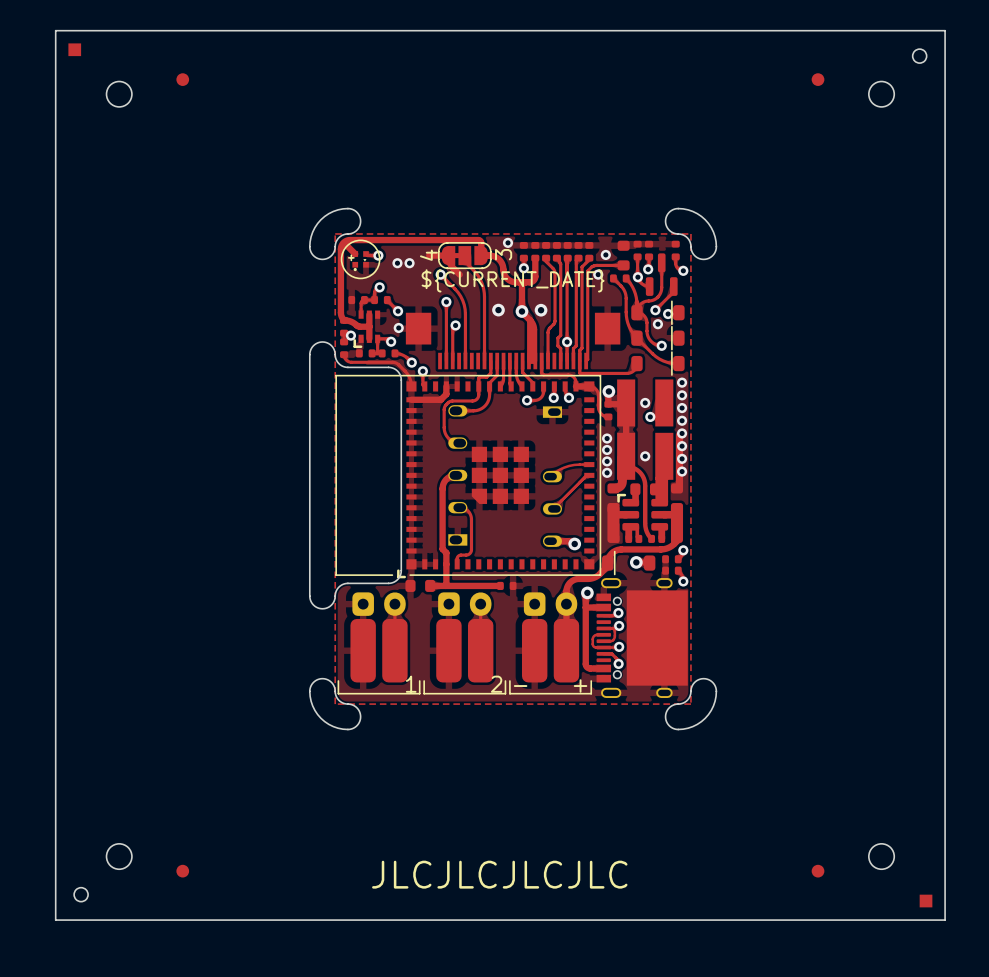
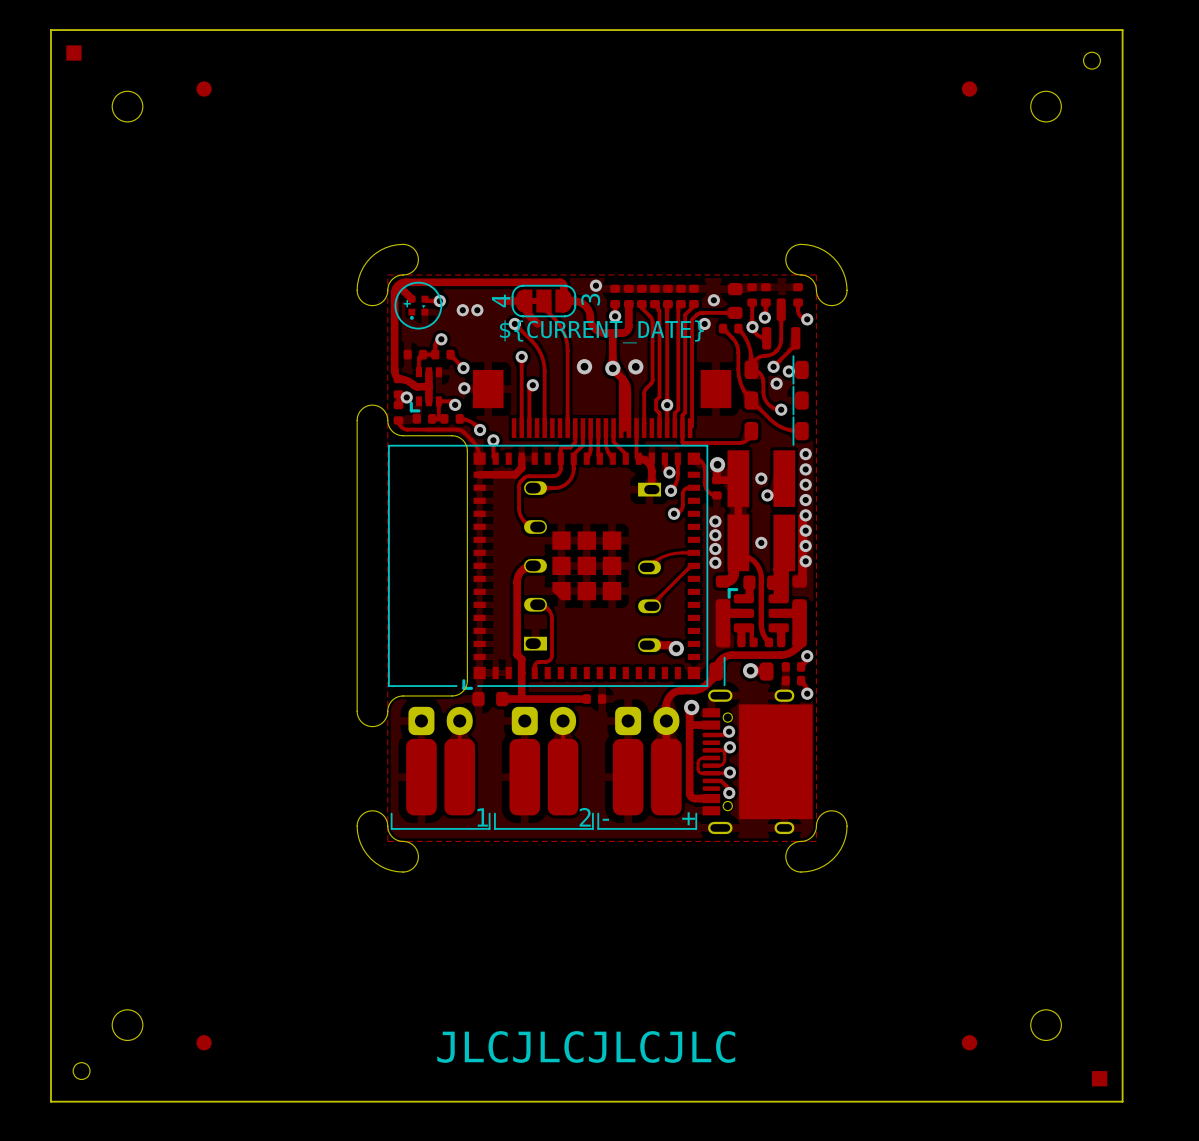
track: (541, 373) (543, 375) (570, 375) (574, 378) (575, 386) (589, 386) -> (636, 442) (636, 457) (645, 460) (651, 467) (651, 489)
track: (543, 386) (543, 393) (540, 398) (527, 400) -> none
track: none -> (677, 458) (677, 478) (670, 490)
via: (553, 397) -> none
via: (527, 400) -> none
track: none -> (693, 487) (684, 490) (682, 508) (674, 513)
via: none -> (670, 490)
via: none -> (674, 513)

